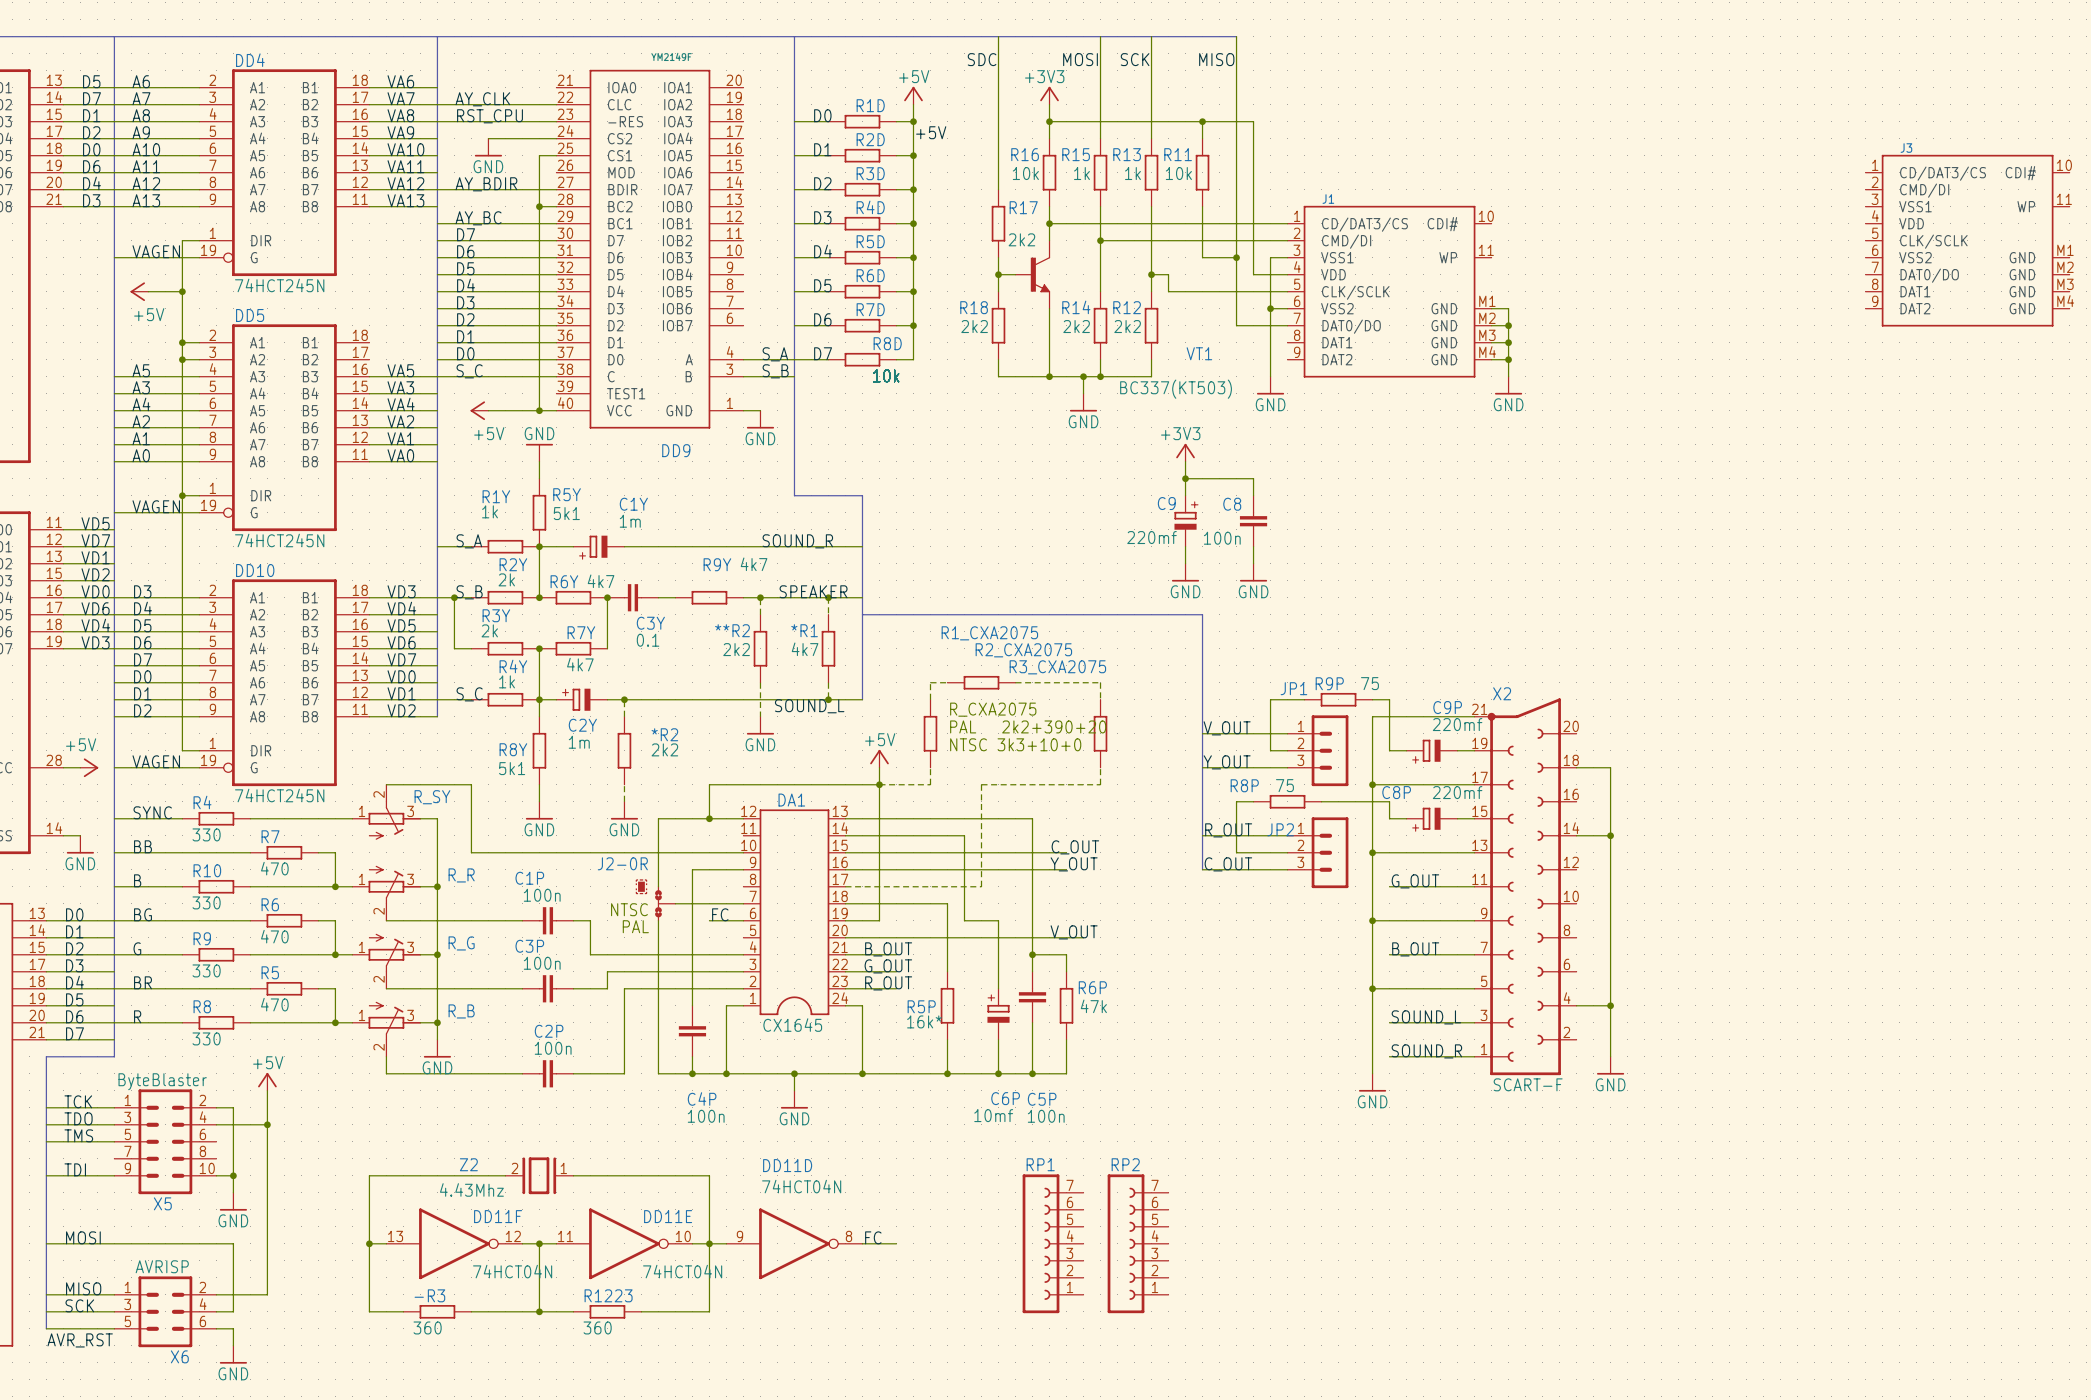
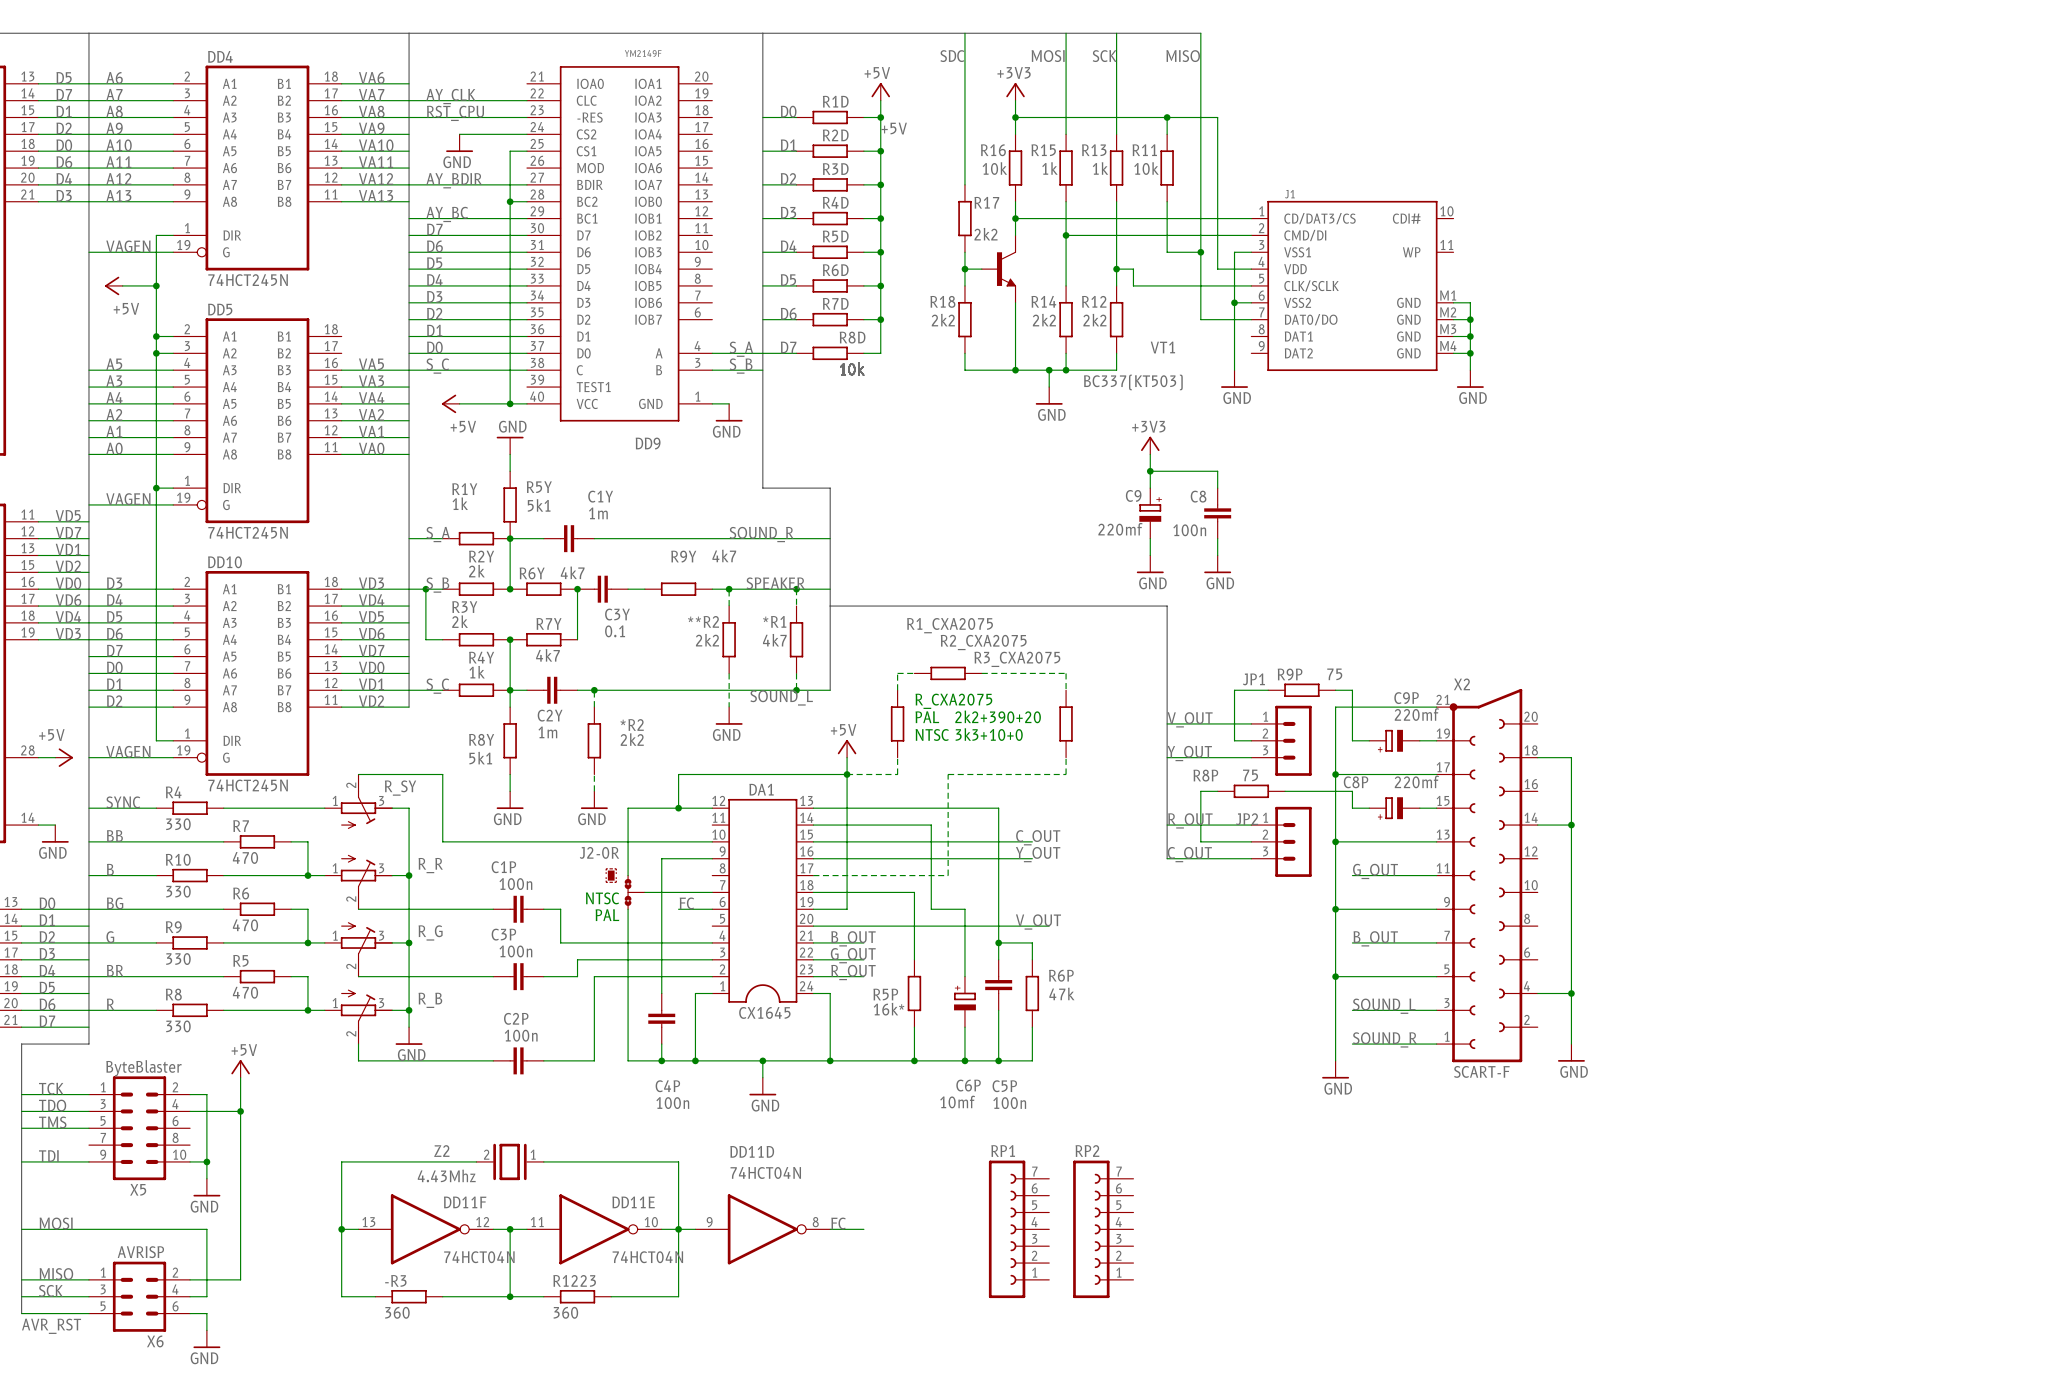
J3: (1967, 240) -> none
C1Y symbol: [573, 535, 625, 558] -> [543, 525, 595, 553]
C2Y symbol: [556, 688, 608, 711] -> [526, 676, 578, 704]

